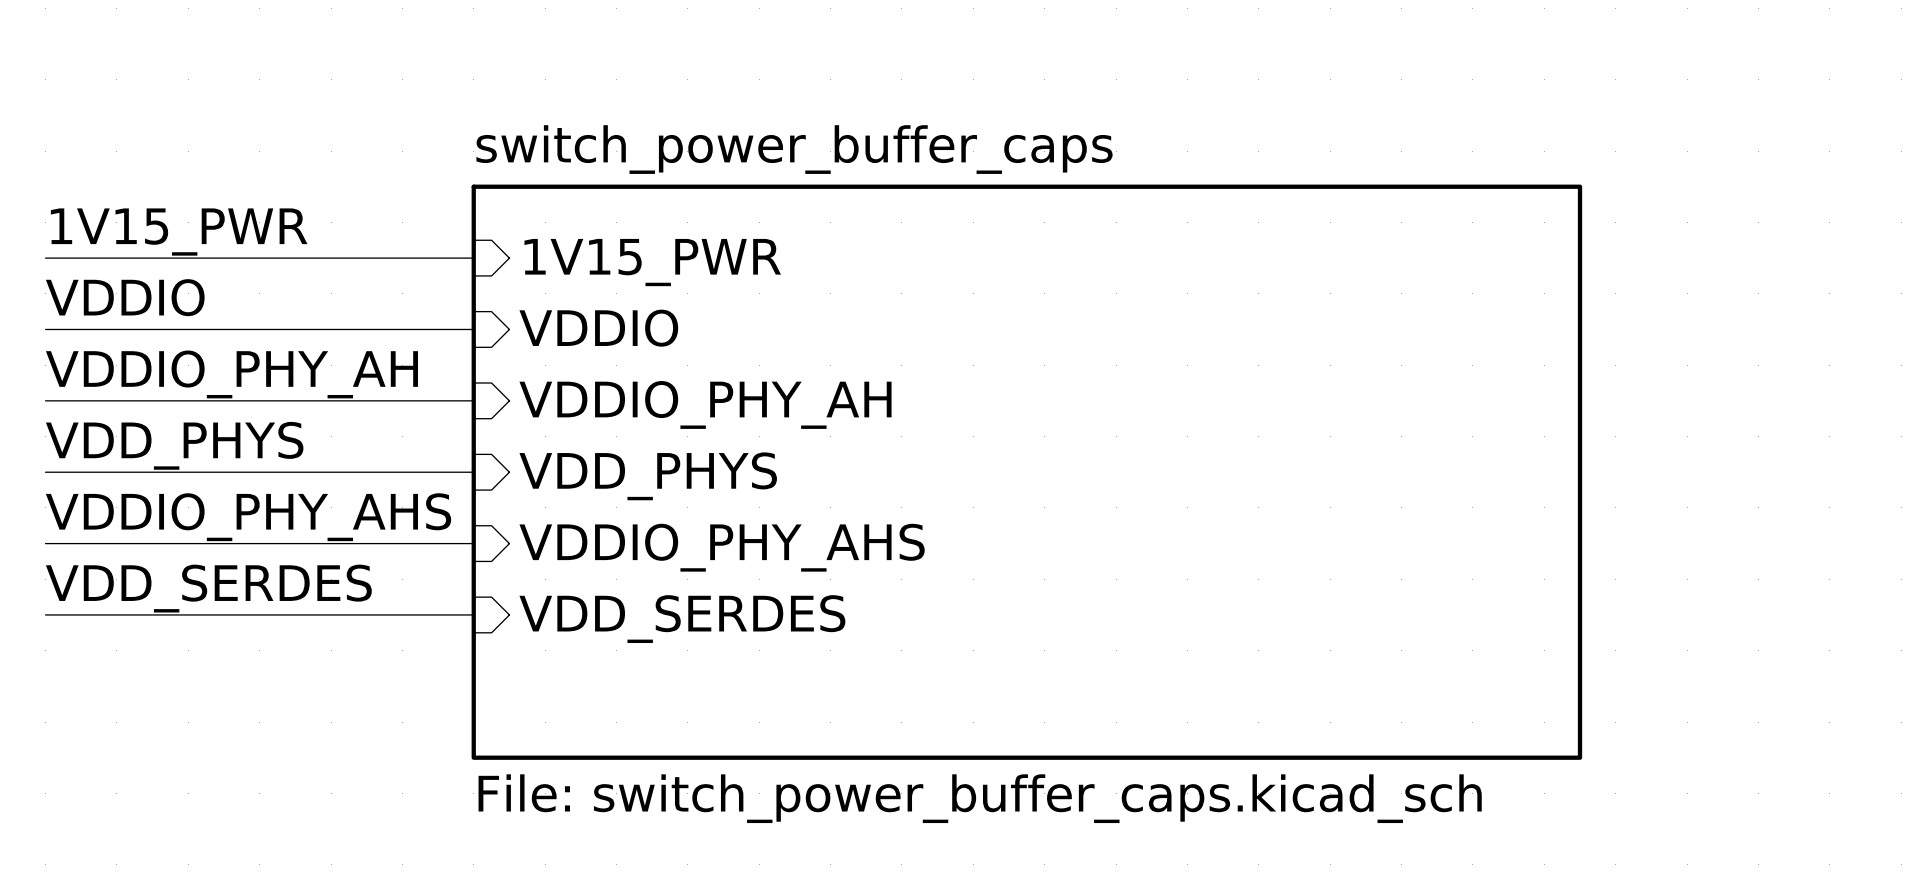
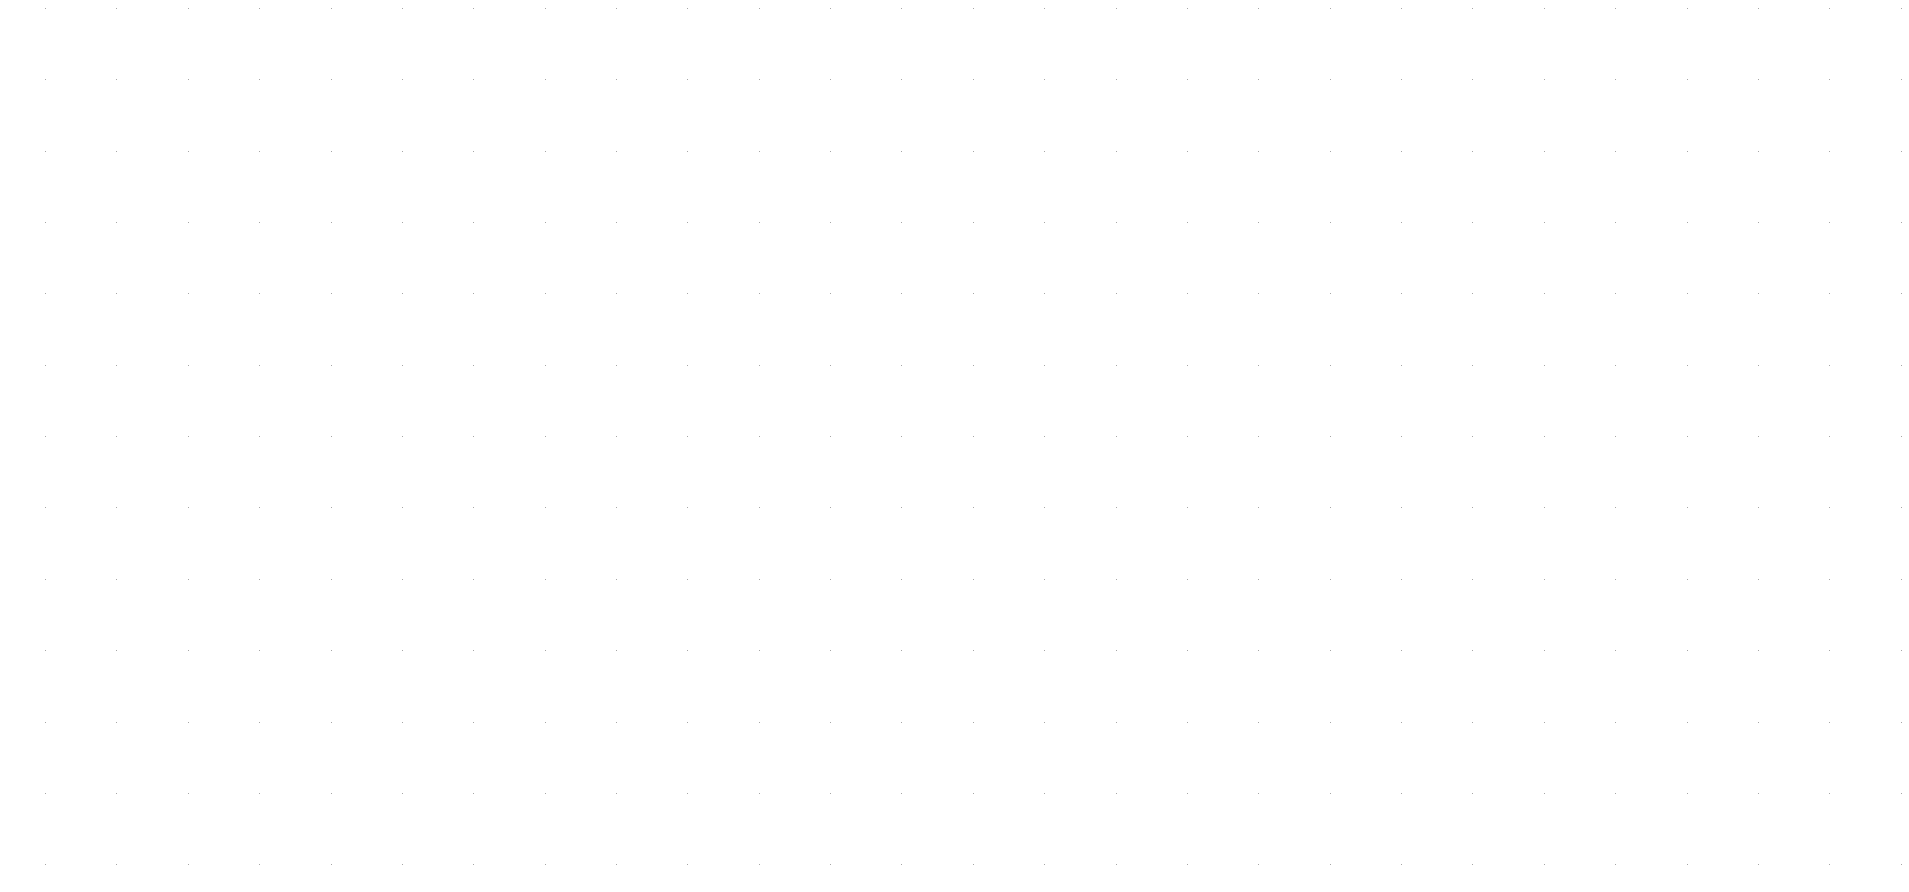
label: 1V15_PWR (179, 232) -> none
wire: (45, 258) (473, 258) -> none
sheet pin: 1V15_PWR (652, 262) -> none
label: VDDIO (125, 297) -> none
sheet pin: VDDIO (598, 328) -> none
wire: (45, 329) (473, 329) -> none
label: VDDIO_PHY_AH (231, 374) -> none
wire: (45, 400) (473, 400) -> none
sheet pin: VDDIO_PHY_AH (705, 404) -> none
label: VDD_PHYS (174, 445) -> none
wire: (45, 472) (473, 472) -> none
sheet switch_power_buffer_caps: File: switch_power_buffer_caps.kicad_sch (1026, 472) -> none
sheet pin: VDD_PHYS (648, 476) -> none
label: VDDIO_PHY_AHS (248, 517) -> none
wire: (45, 543) (473, 543) -> none
sheet pin: VDDIO_PHY_AHS (722, 547) -> none
label: VDD_SERDES (208, 588) -> none
wire: (45, 614) (473, 614) -> none
sheet pin: VDD_SERDES (682, 619) -> none

